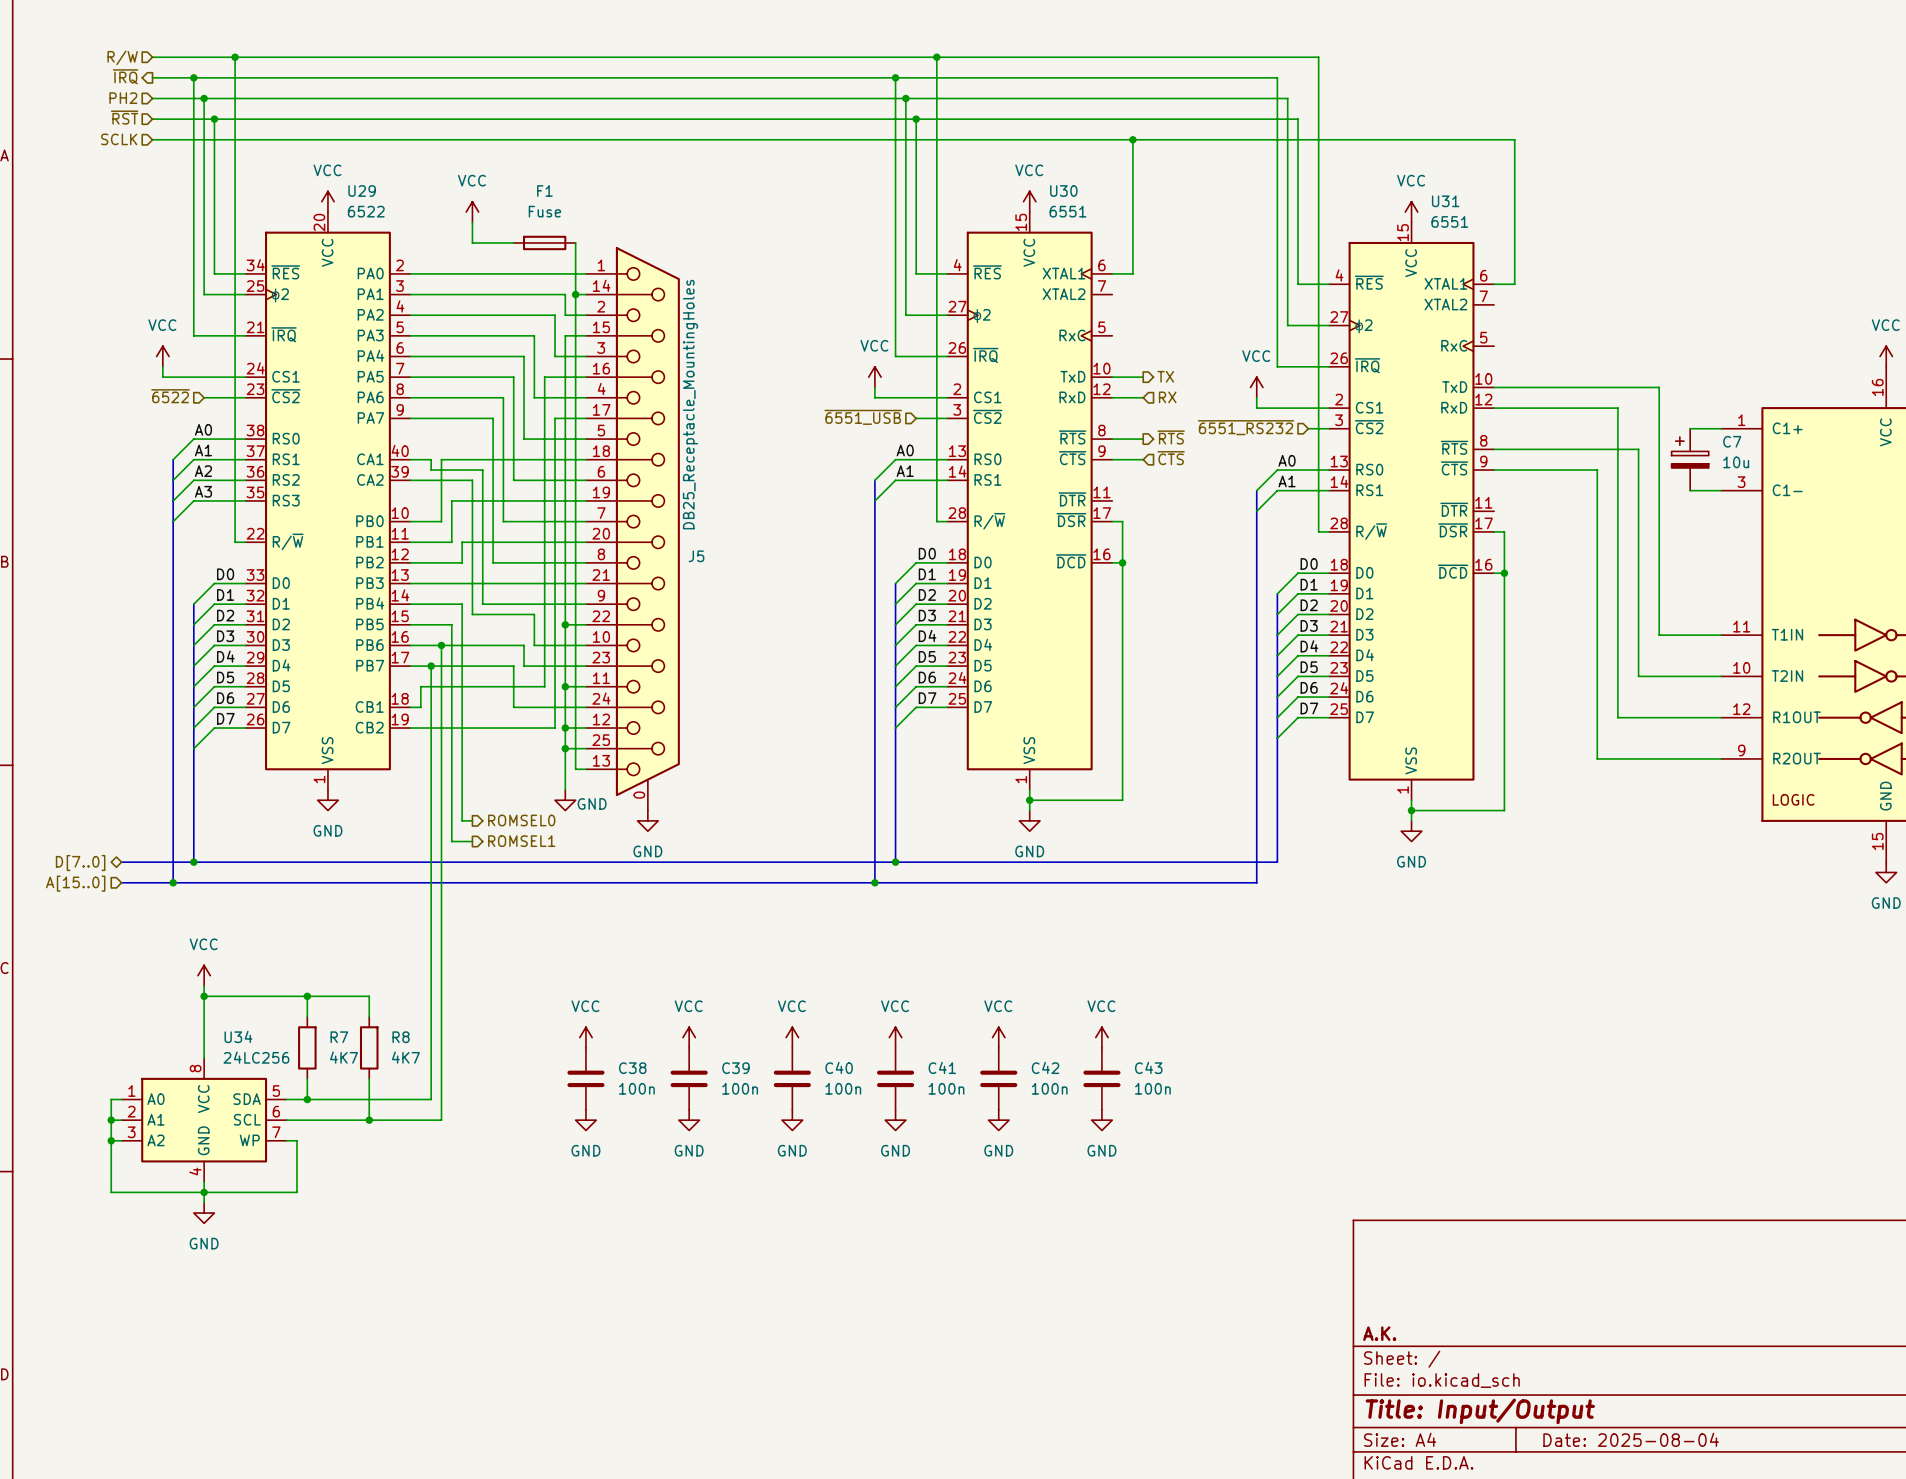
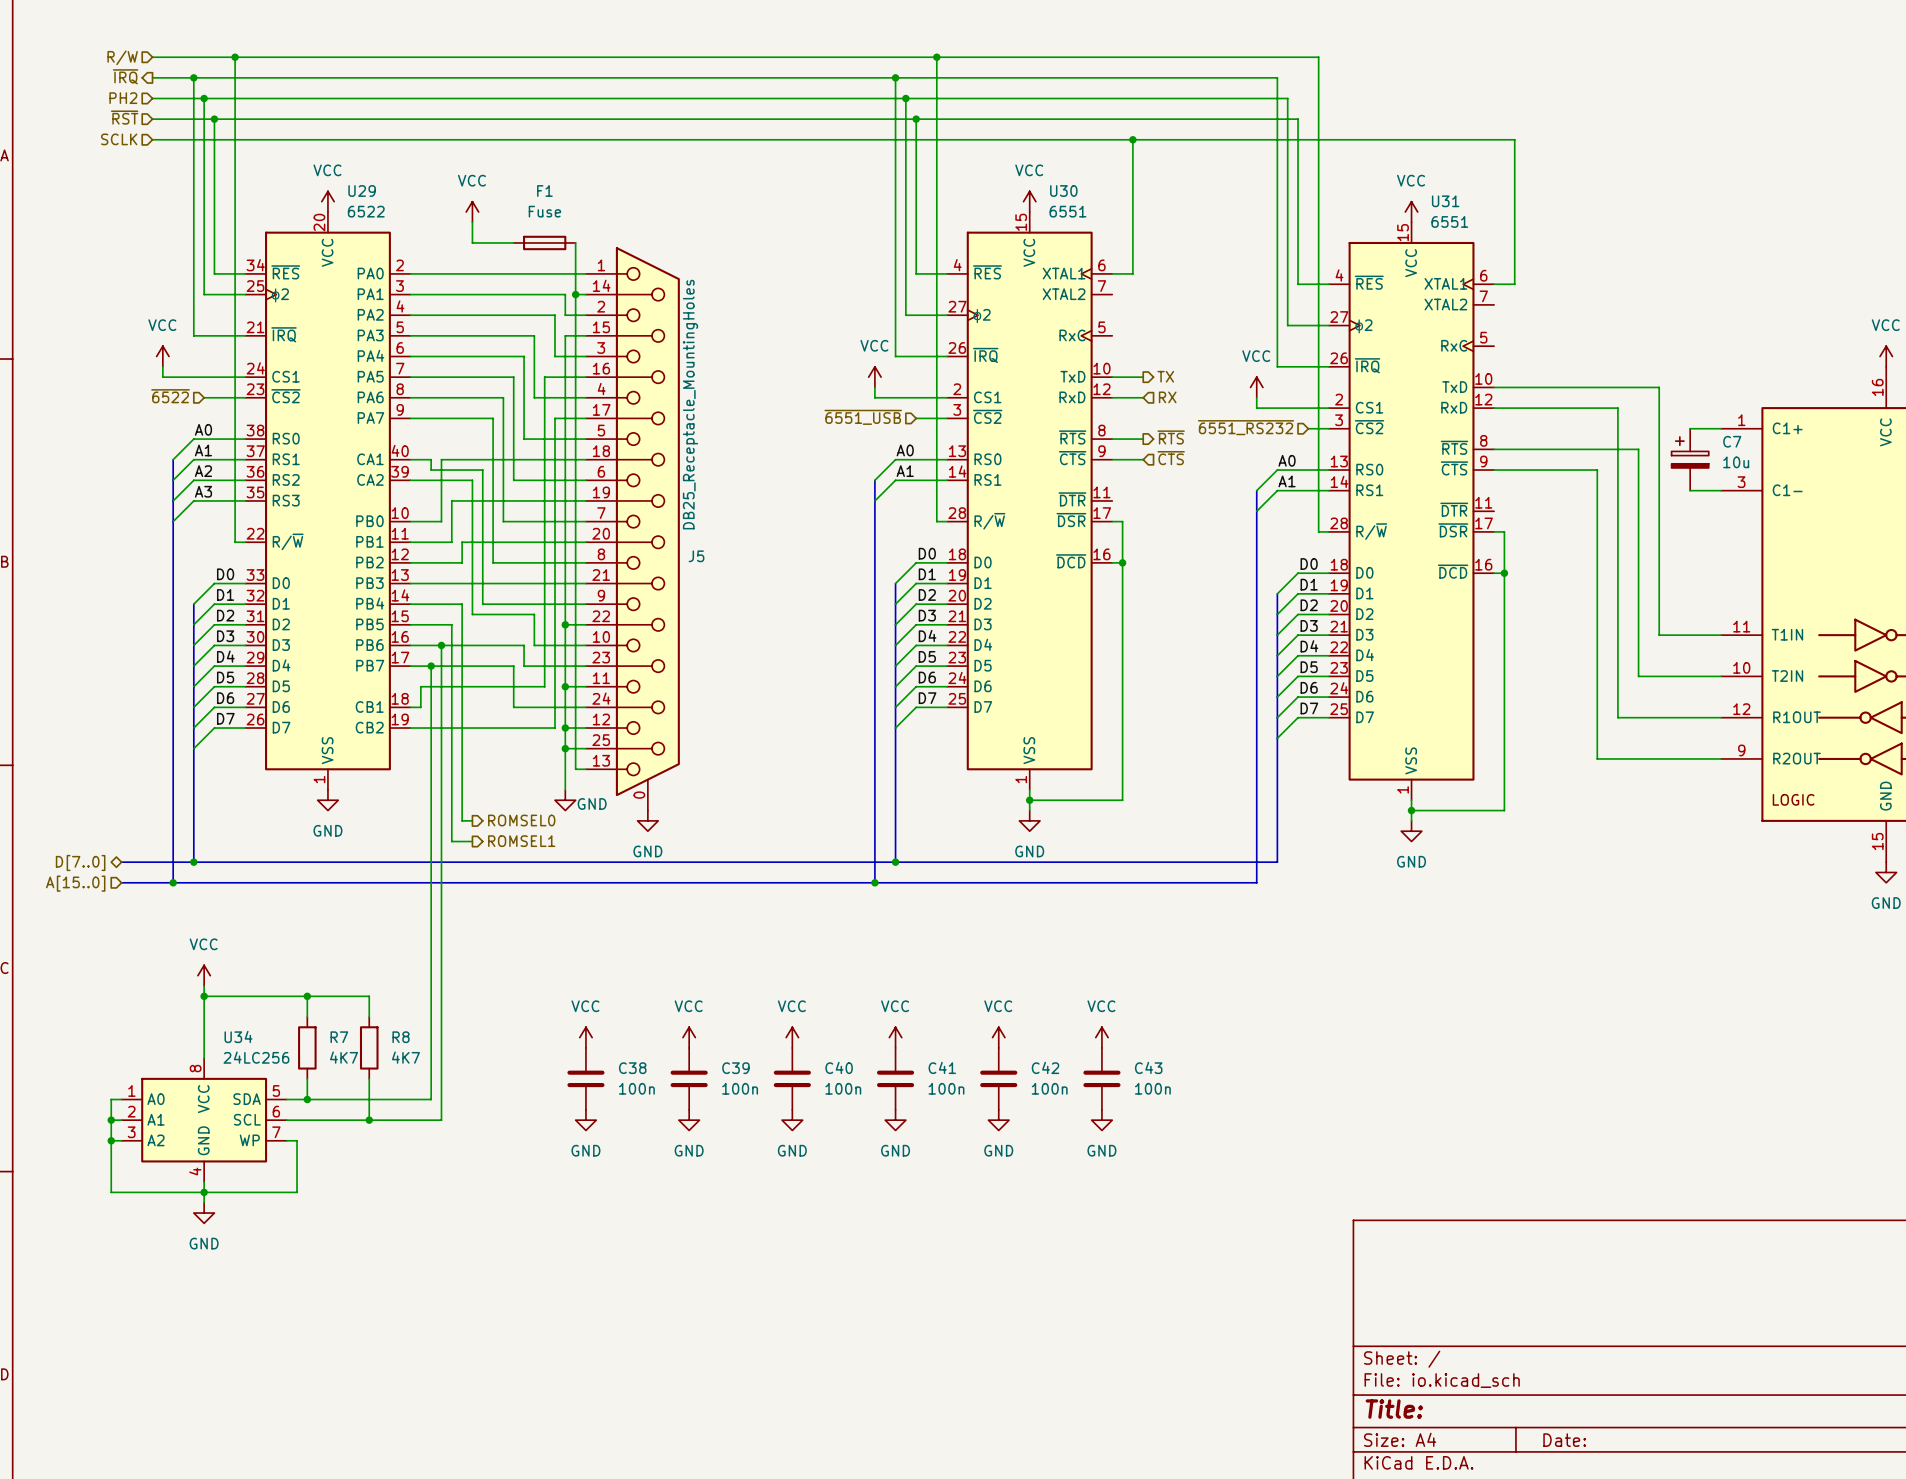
title block: A.K. (1379, 1333) -> none
title block: Title: Input/Output (1480, 1411) -> Title: (1394, 1409)
title block: Date: 2025-08-04 (1631, 1439) -> Date: (1564, 1440)

